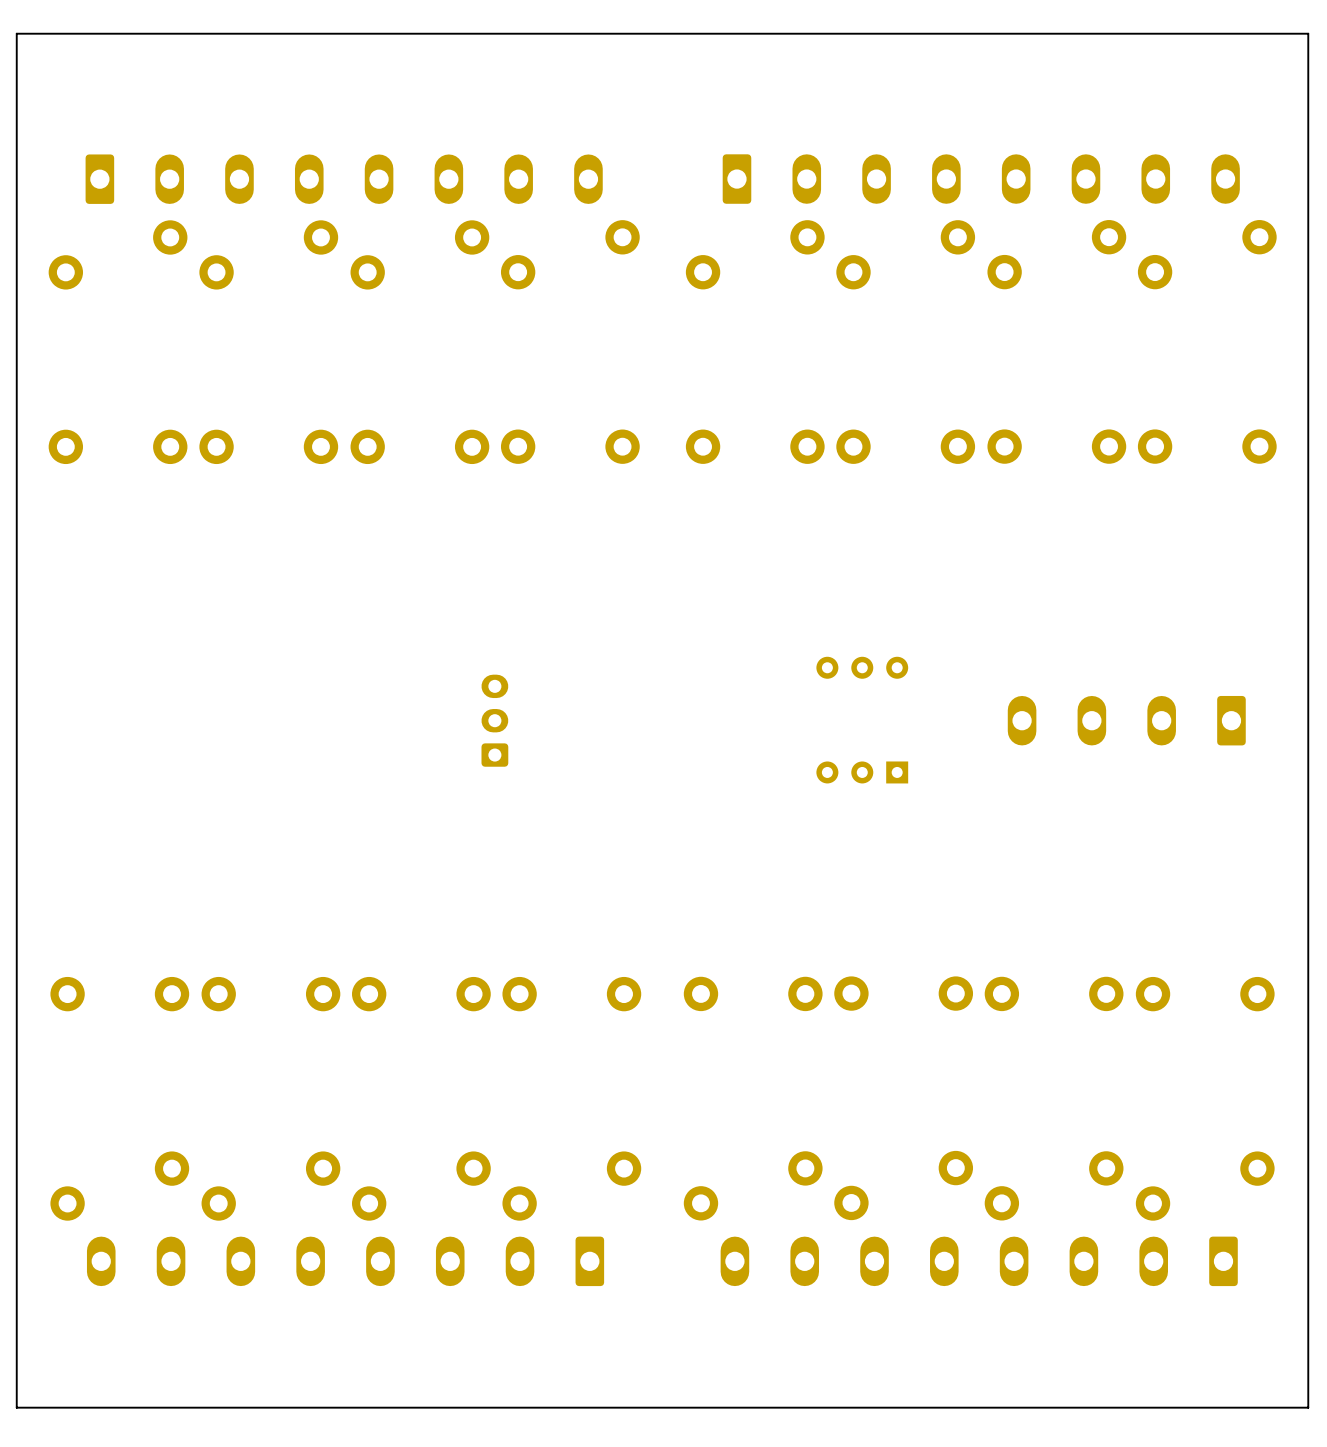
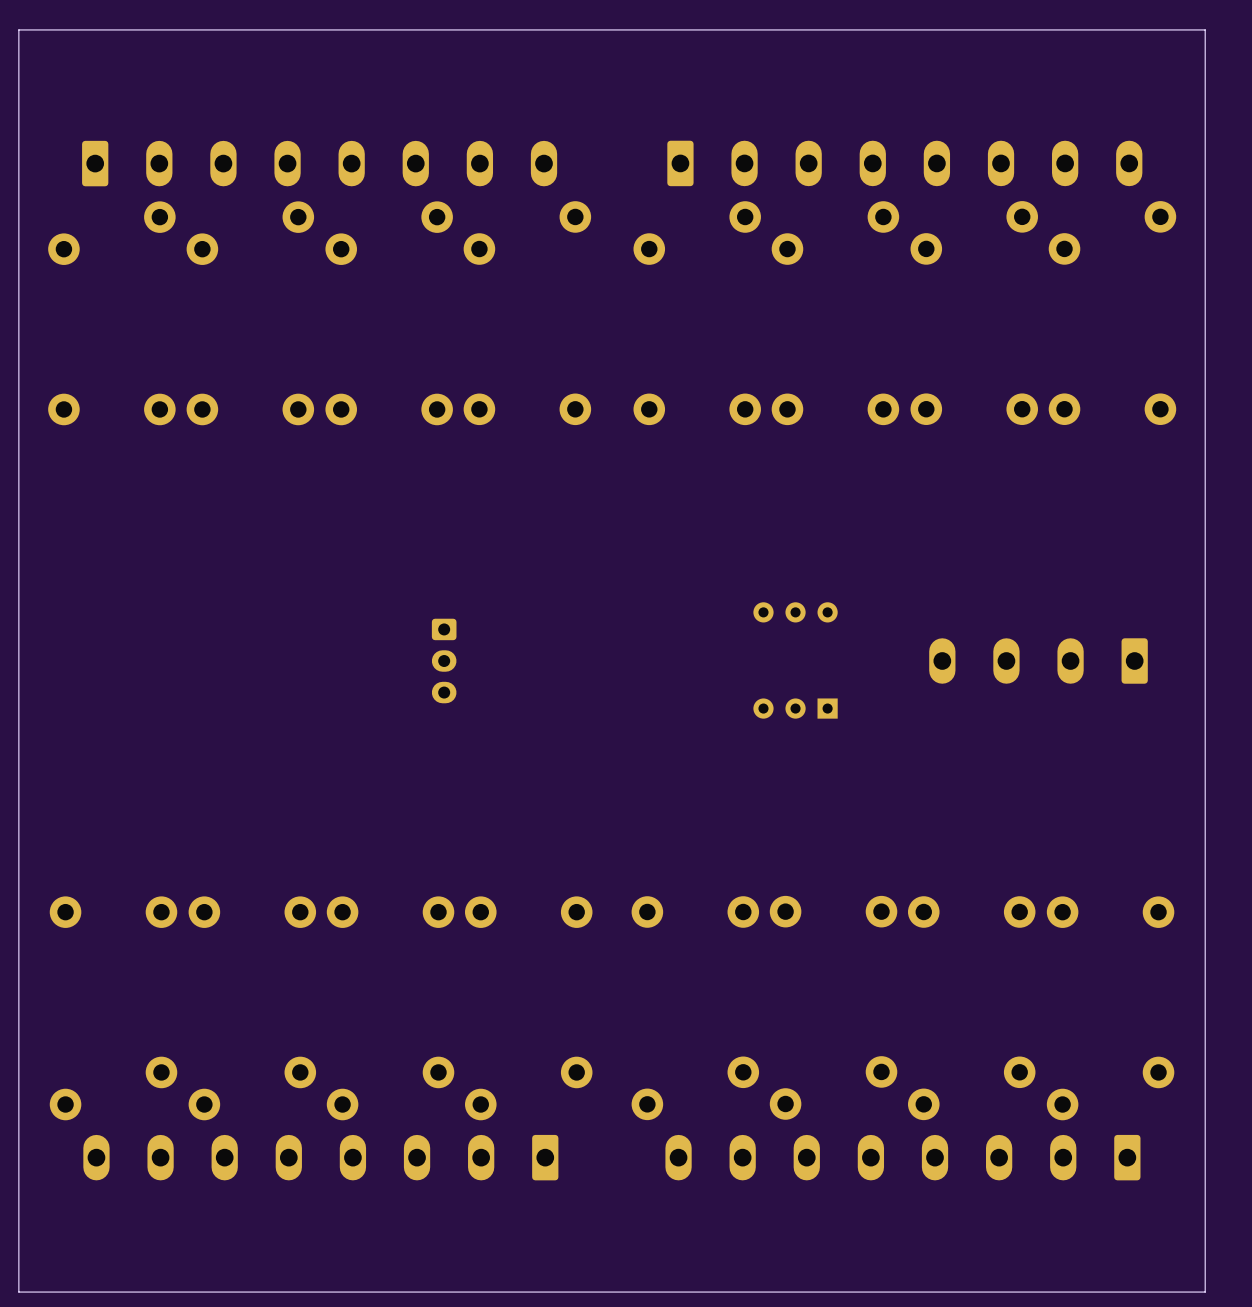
part rotation: 0° (494, 720) -> 180° (444, 661)

